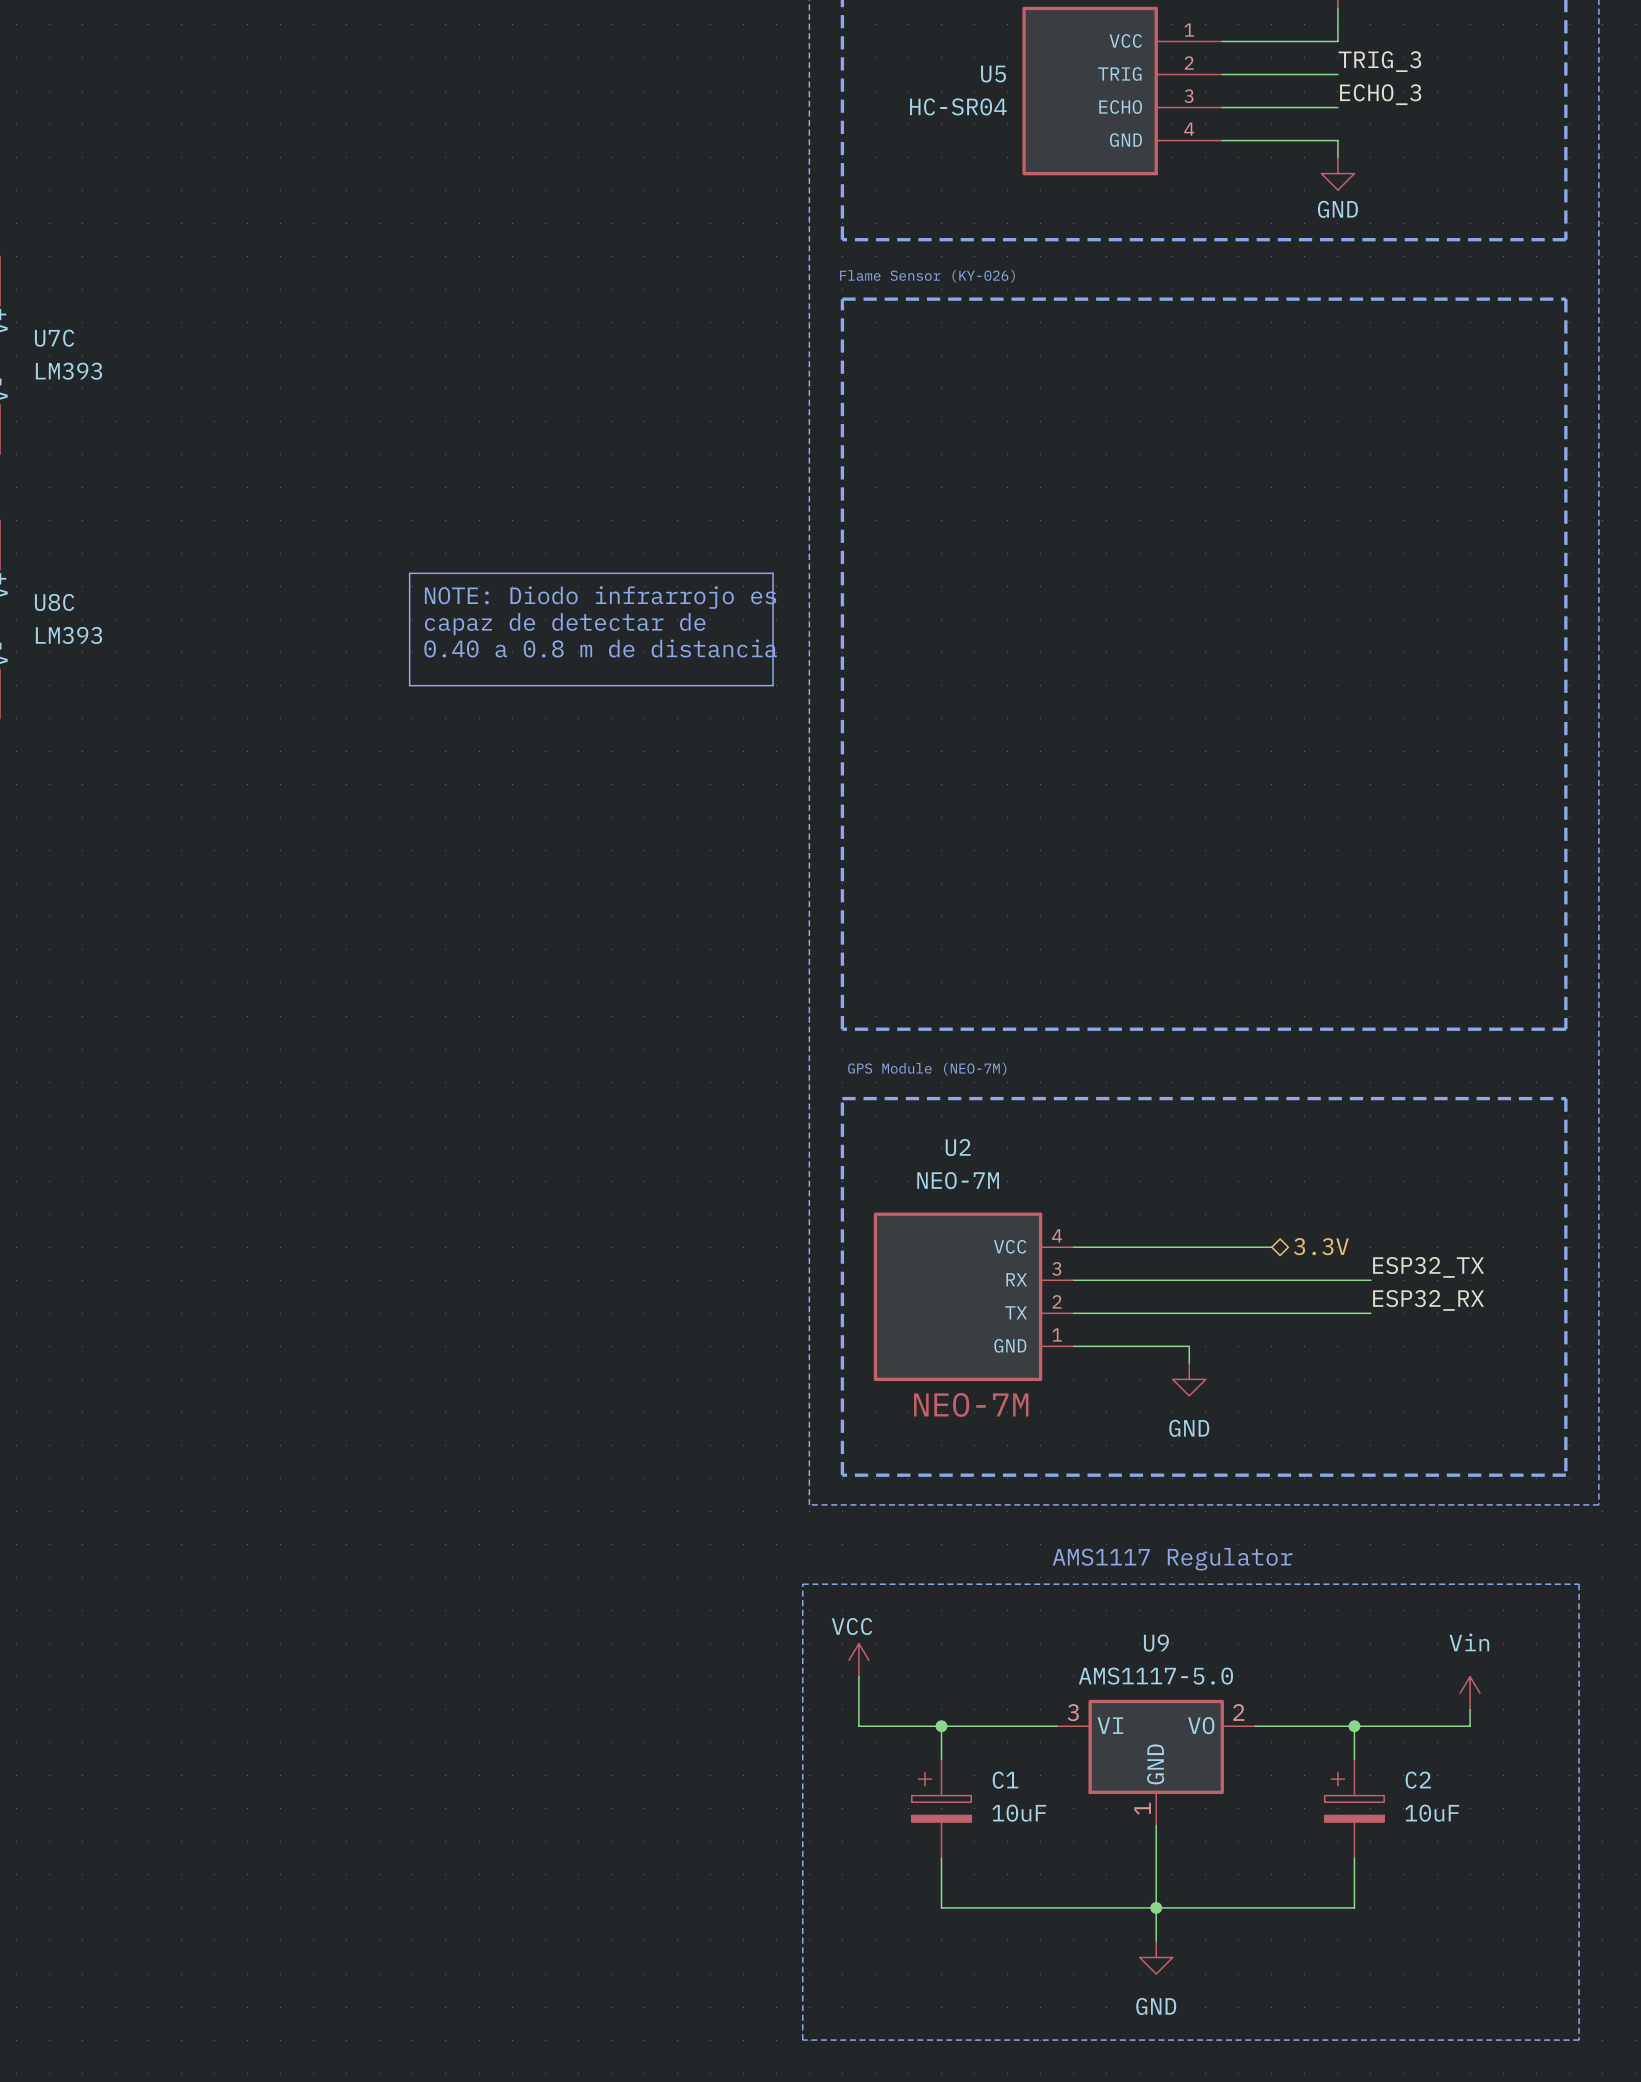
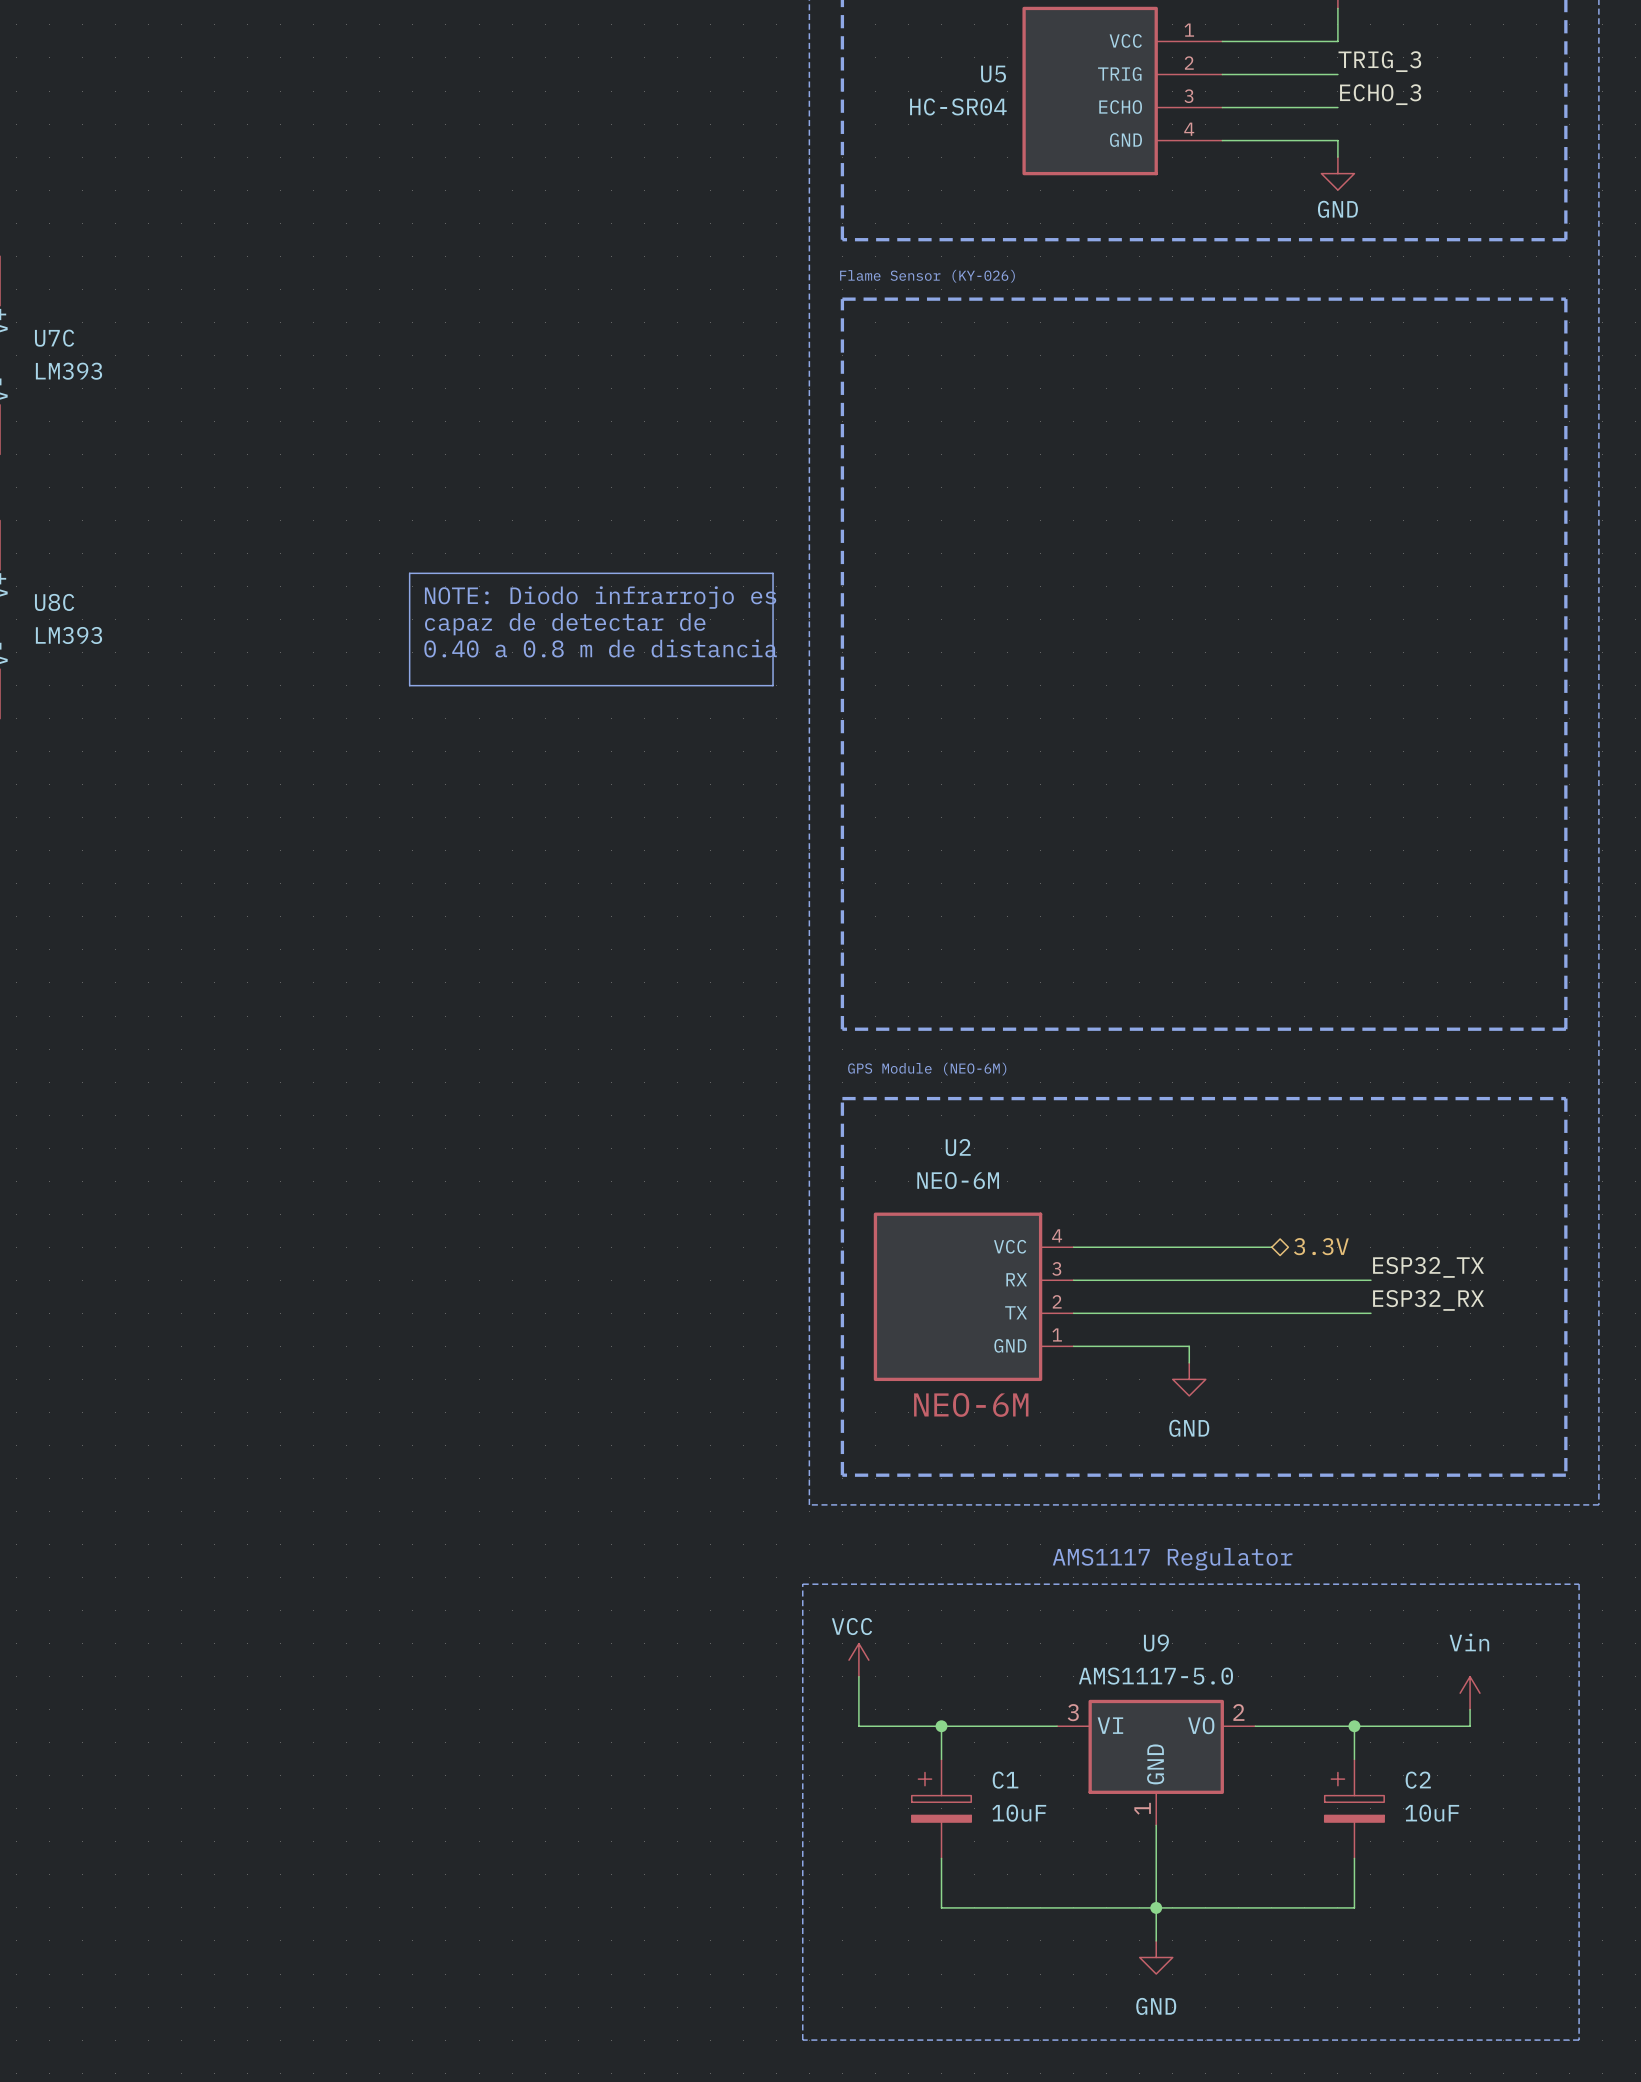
text: GPS Module (NEO-7M) (927, 1069) -> GPS Module (NEO-6M) (927, 1069)
U2 value: NEO-7M (958, 1180) -> NEO-6M (958, 1180)
U2 text: NEO-7M (971, 1404) -> NEO-6M (971, 1404)

